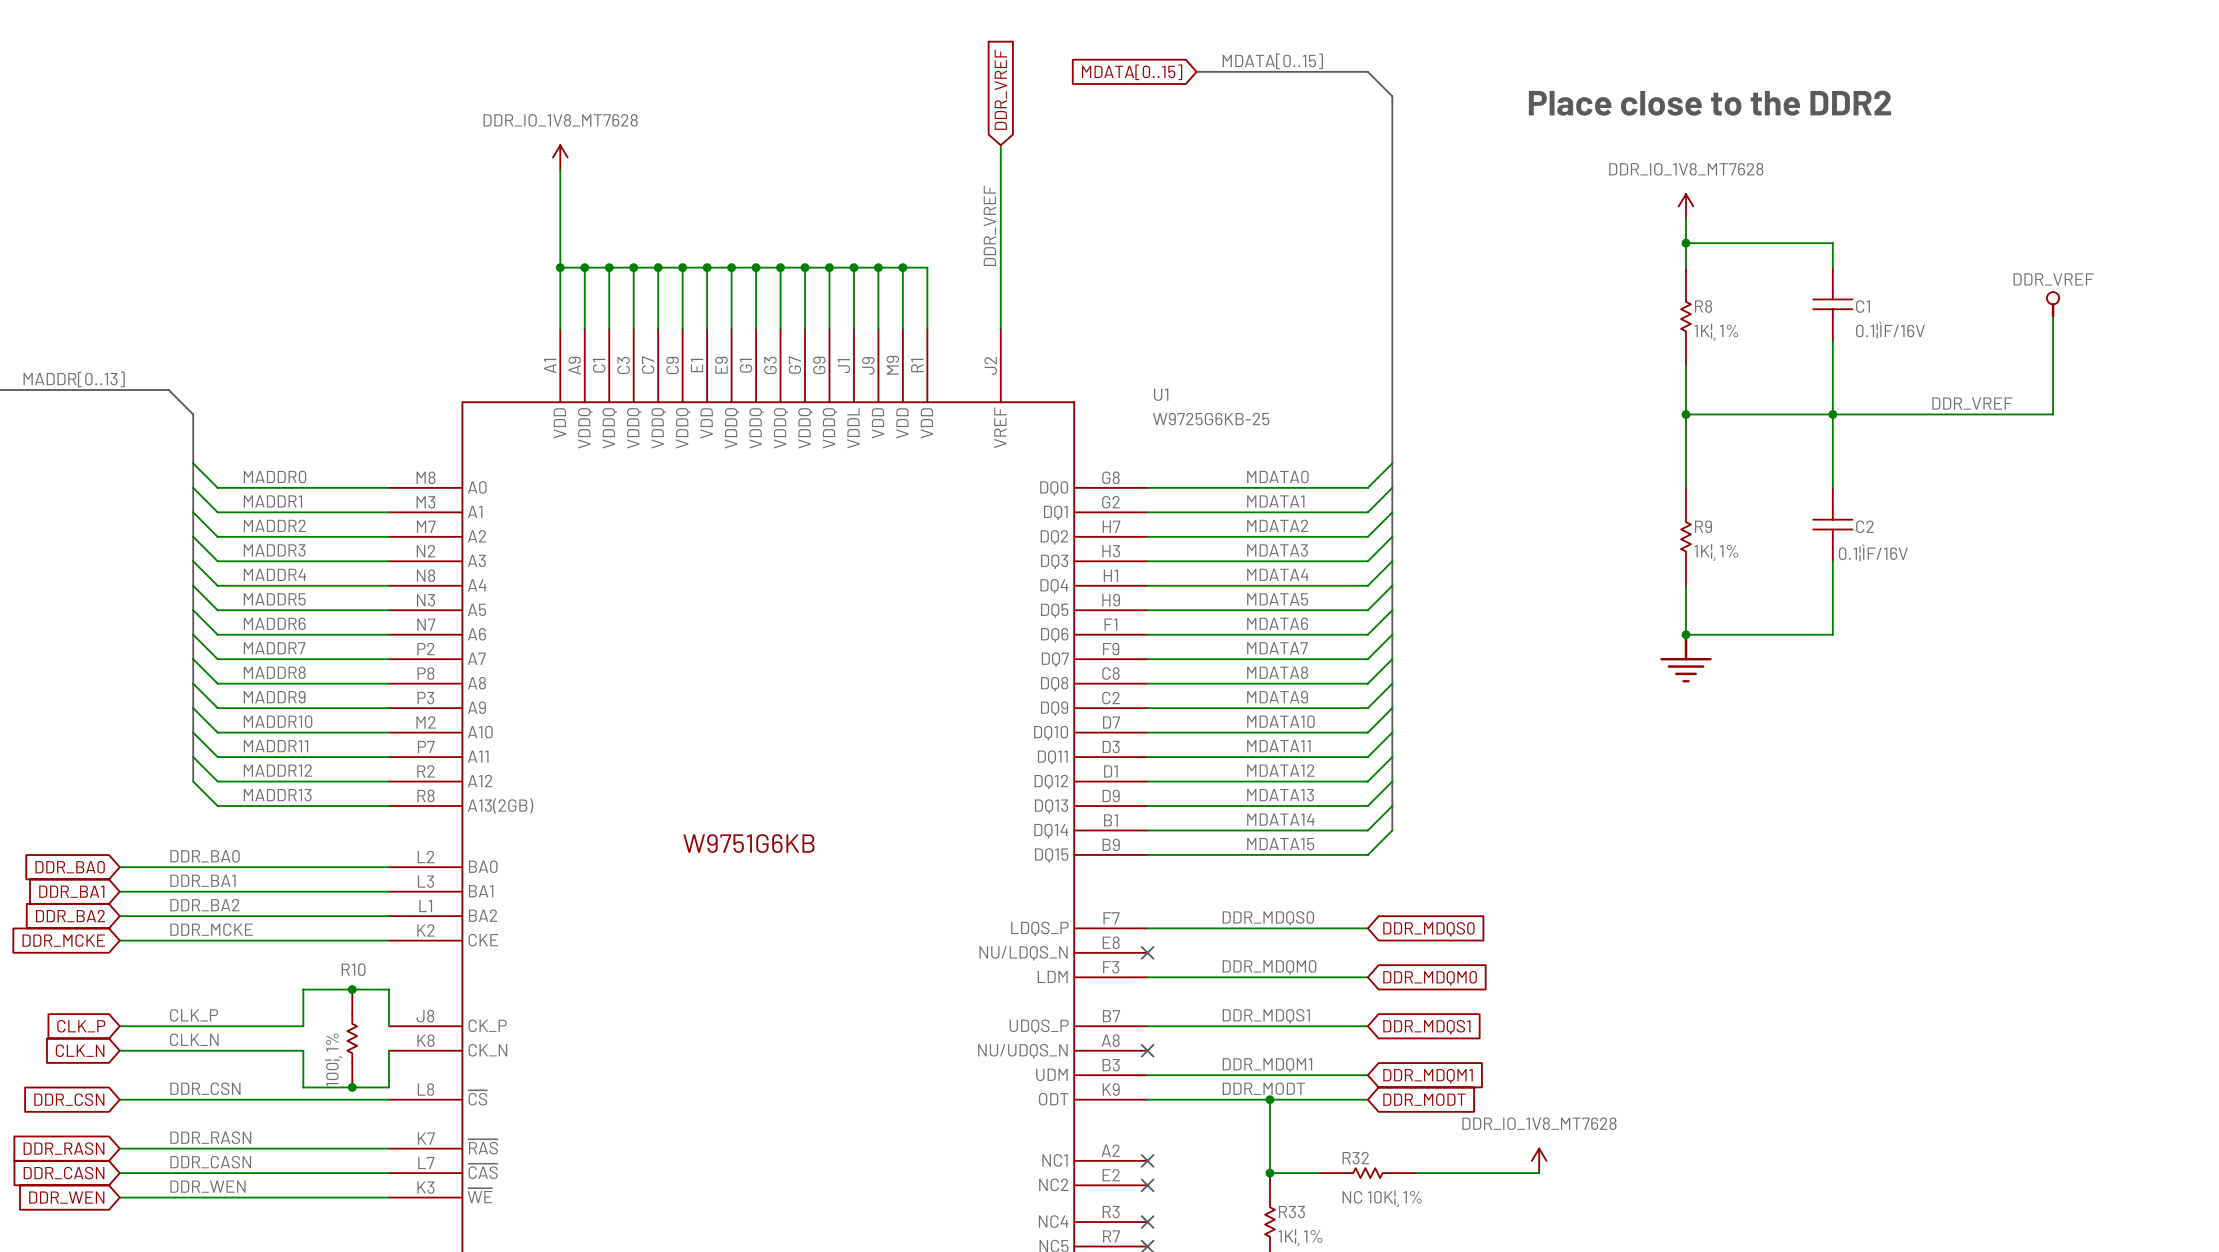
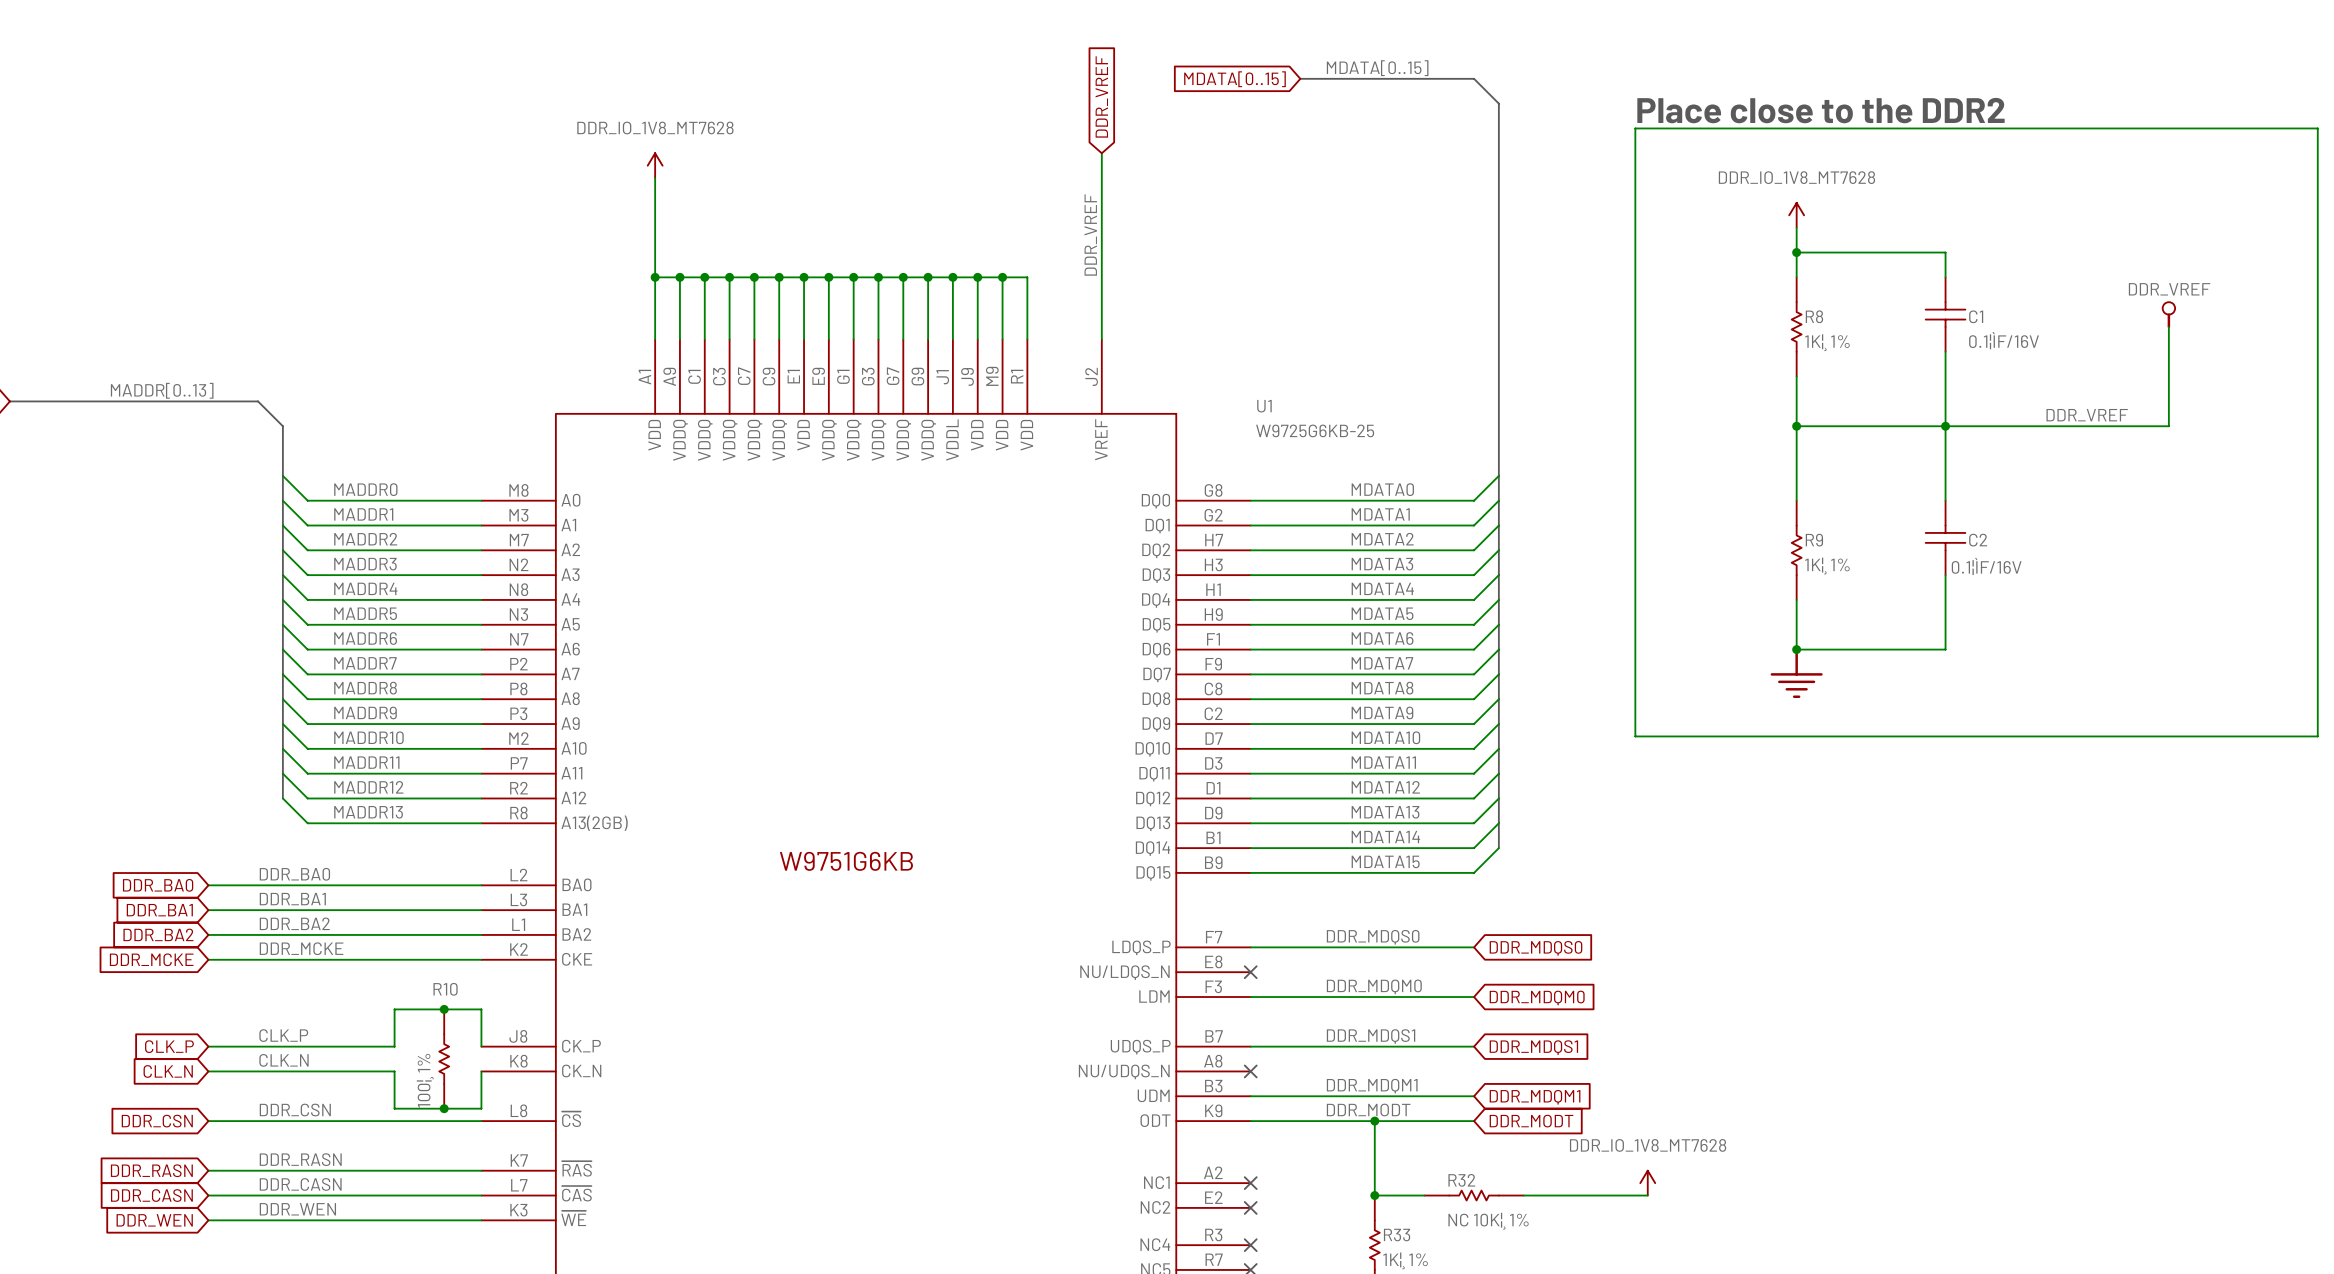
wire: none -> (1635, 128) (1635, 736) (2317, 736) (2317, 128) (1635, 128)

